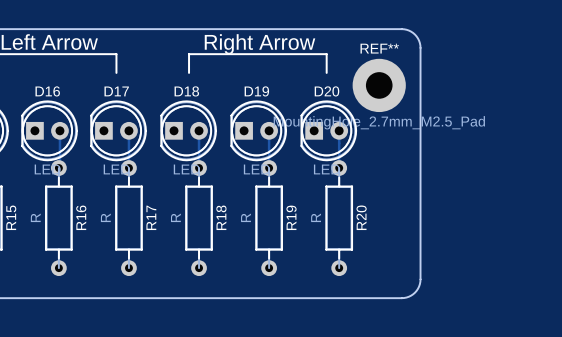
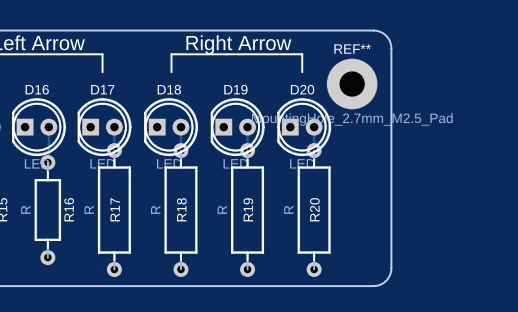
R17 footprint: [115, 160, 143, 277] -> [98, 143, 131, 277]
R18 footprint: [185, 160, 213, 277] -> [164, 143, 198, 277]
R19 footprint: [255, 160, 283, 277] -> [231, 143, 264, 277]
R20 footprint: [325, 160, 353, 277] -> [298, 143, 331, 277]
R17 name position: R17 (151, 217) -> R17 (115, 209)
R18 name position: R18 (221, 217) -> R18 (181, 209)
R19 name position: R19 (291, 217) -> R19 (248, 209)
R20 name position: R20 (361, 217) -> R20 (314, 209)

